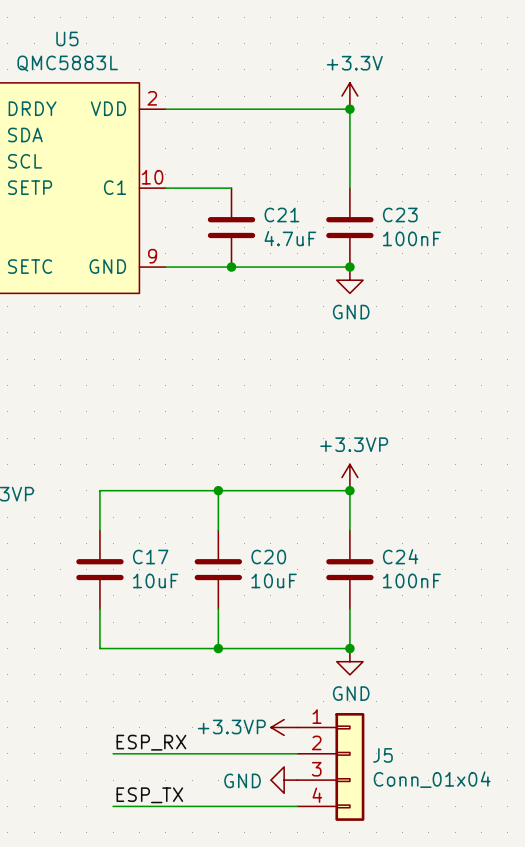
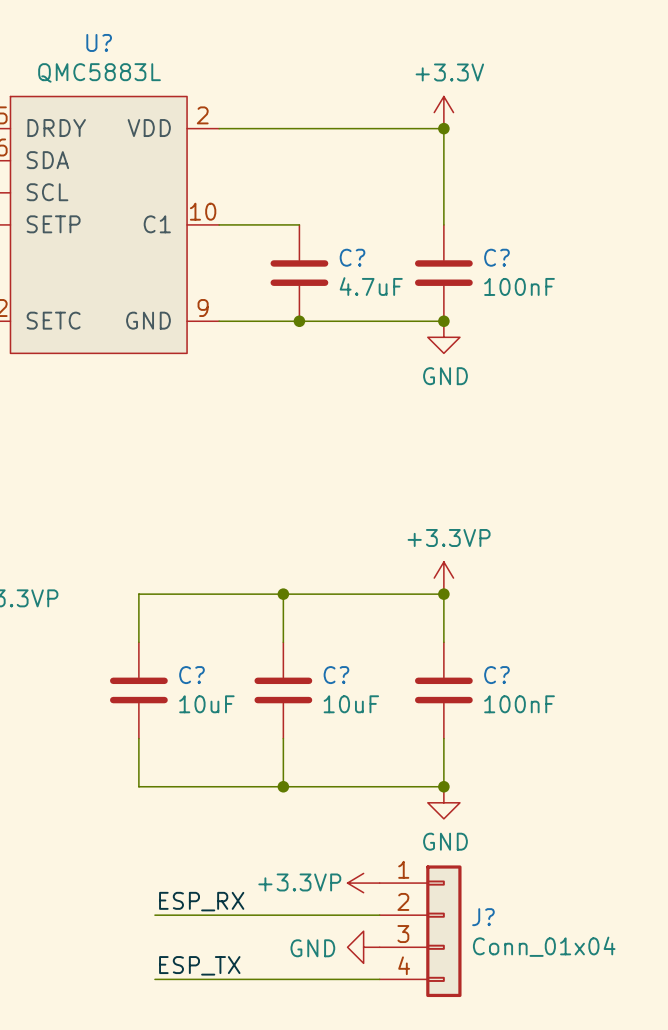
U5 name: U5 (67, 38) -> U? (99, 42)
C21 name: C21 (281, 214) -> C? (352, 257)
C23 name: C23 (400, 214) -> C? (496, 257)
C24 name: C24 (400, 556) -> C? (496, 675)
C17 name: C17 (150, 557) -> C? (191, 675)
C20 name: C20 (268, 557) -> C? (336, 675)
J5 name: J5 (382, 755) -> J? (483, 917)

